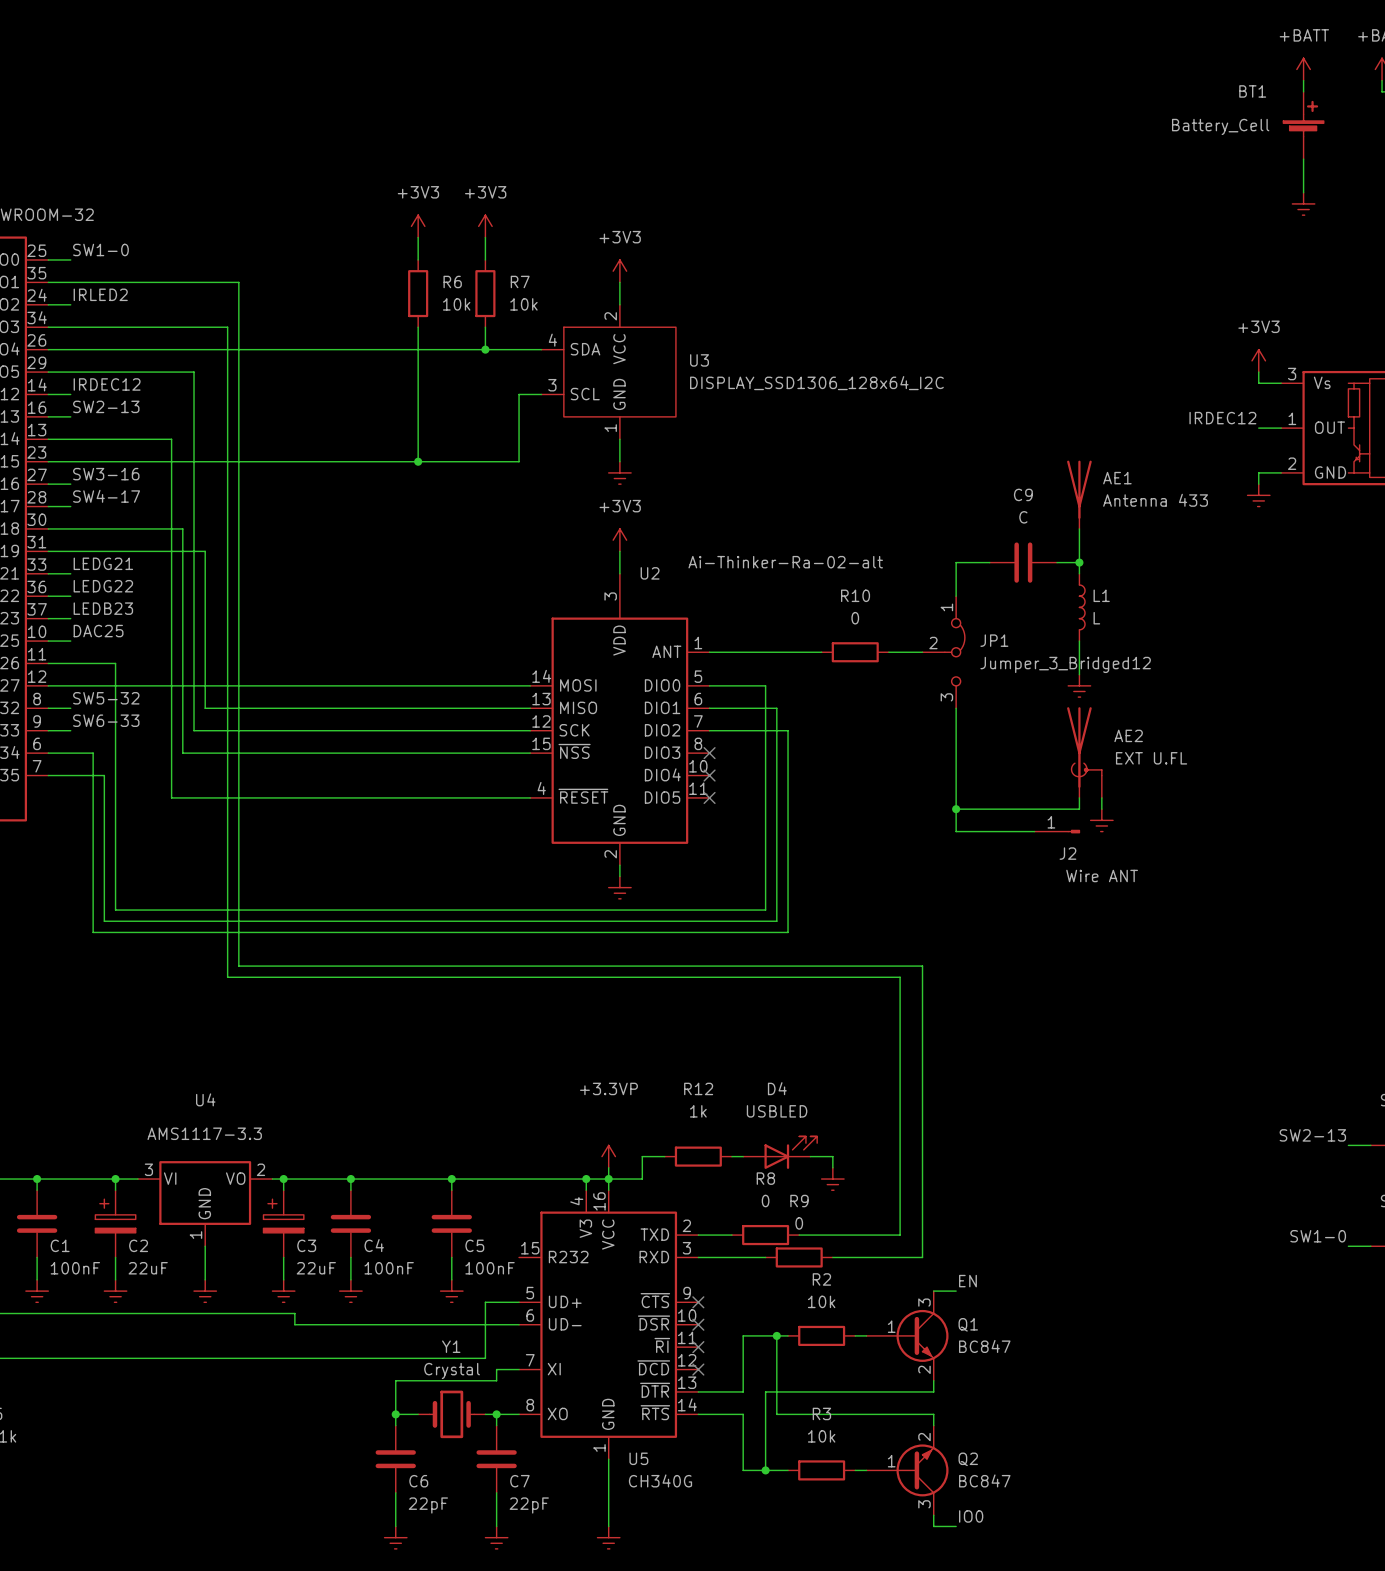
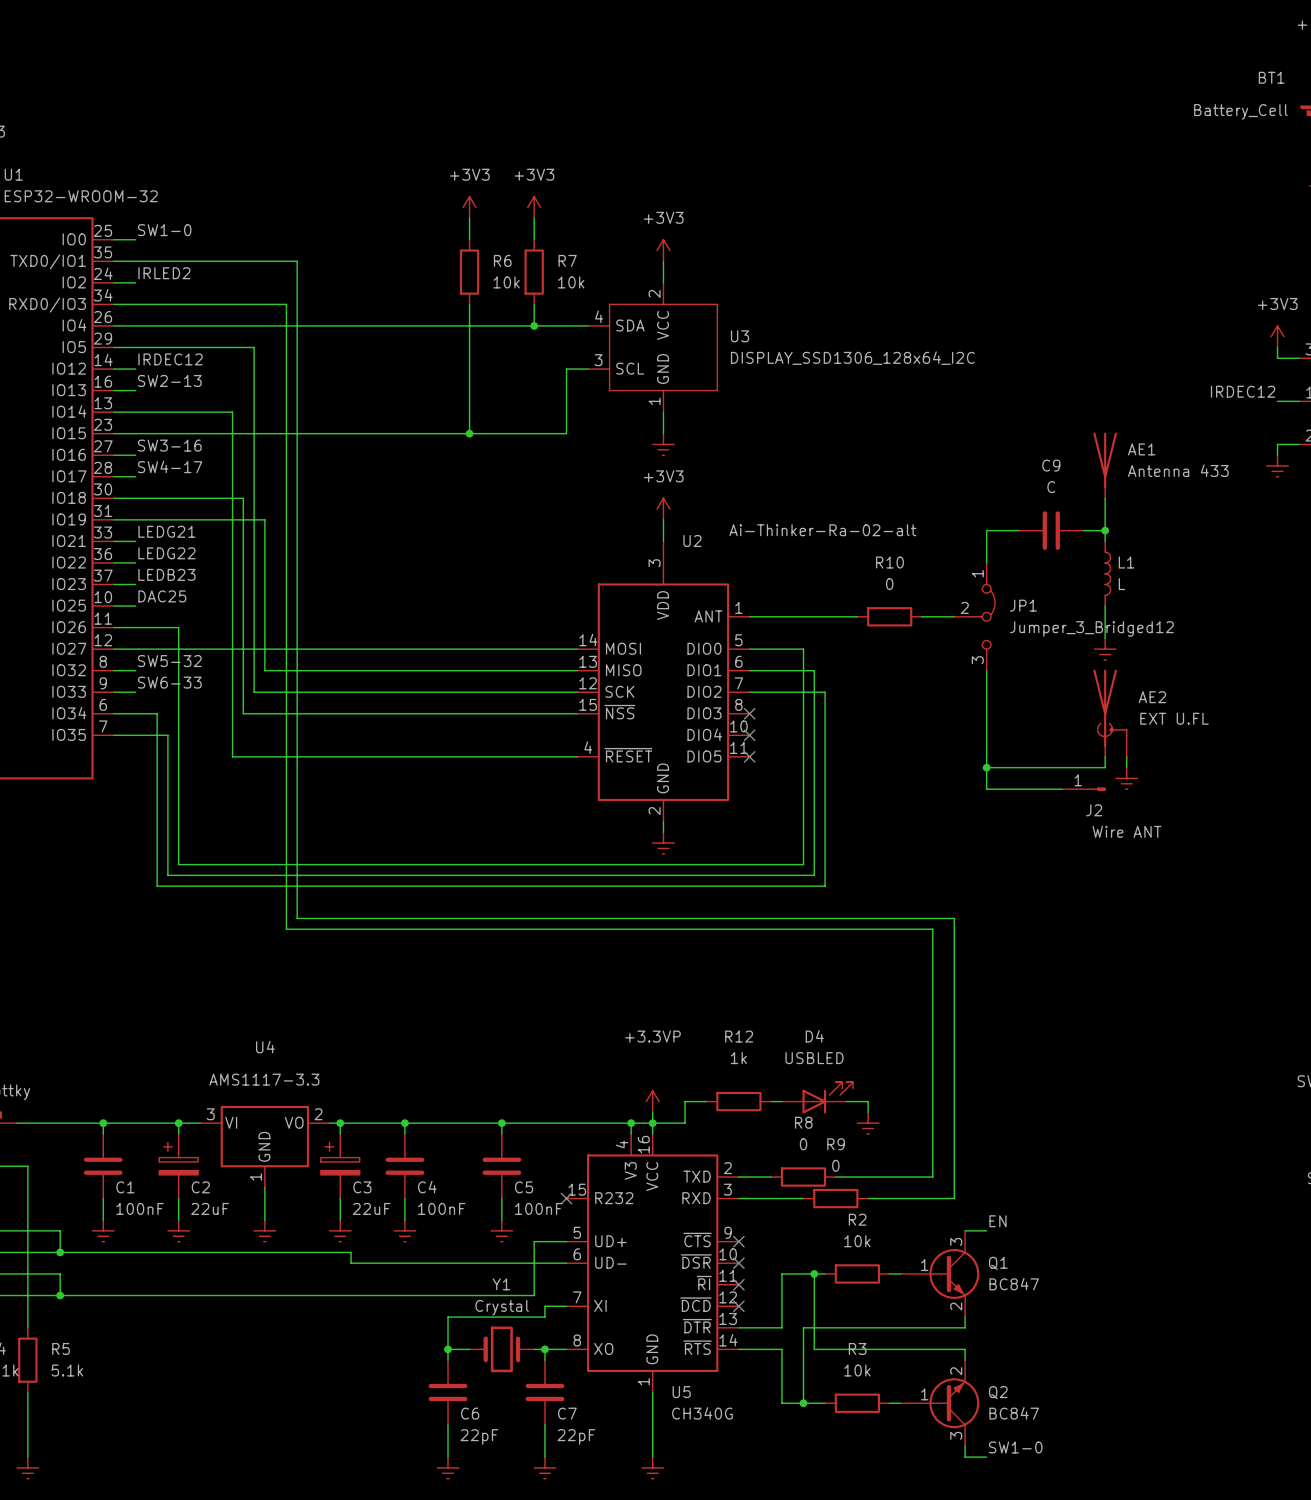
no-connect mark: none -> (566, 1198)
label: IO0 (971, 1516) -> SW1-0 (1015, 1447)

